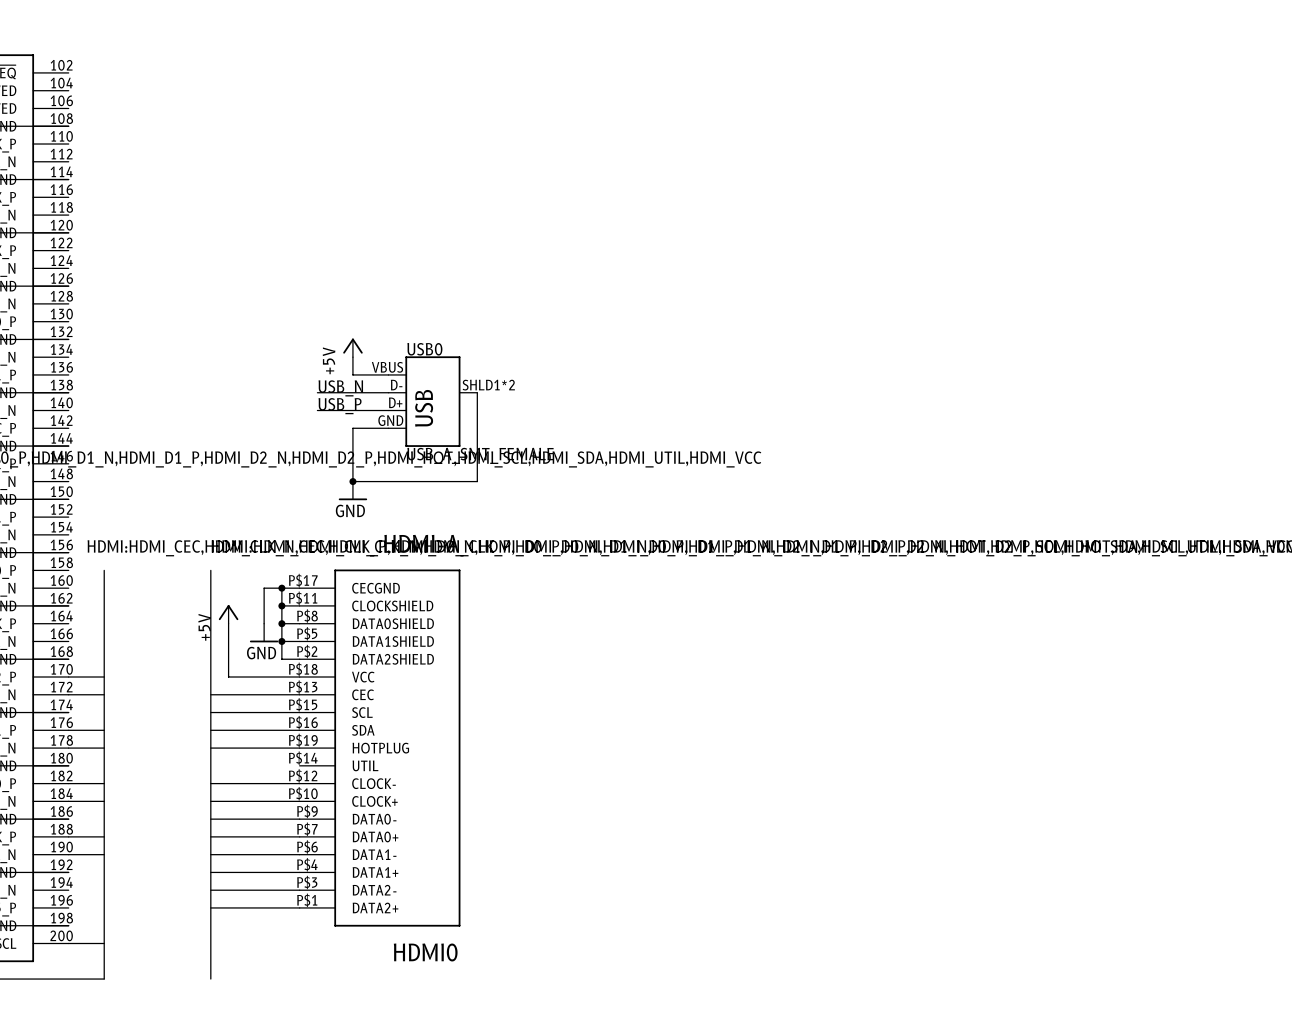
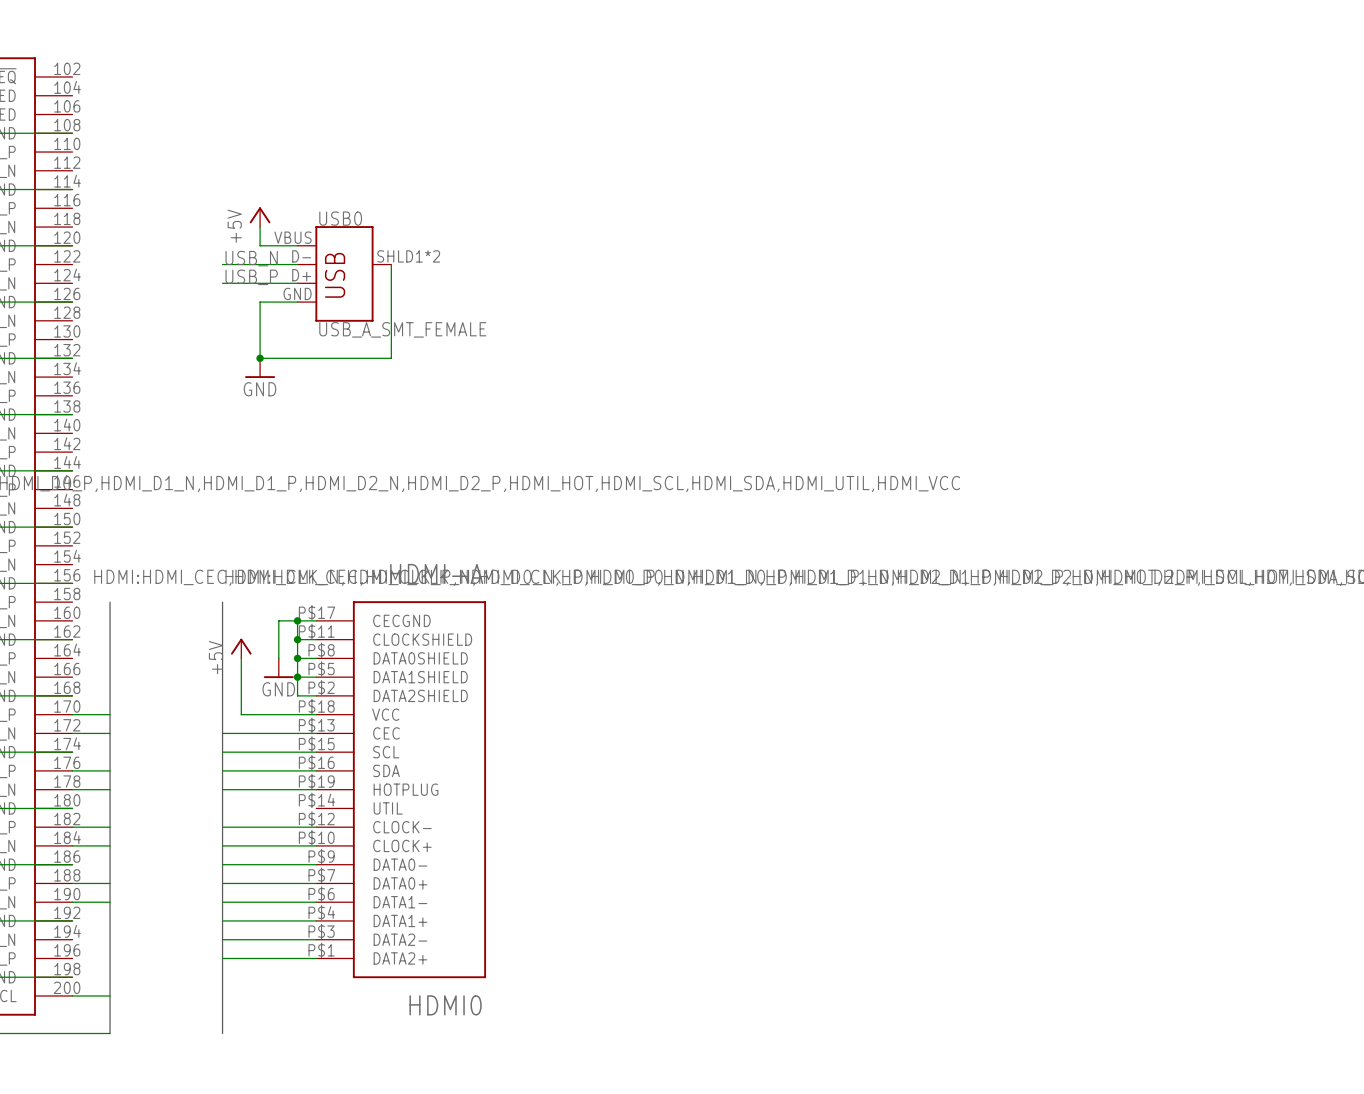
power symbol: none -> +5V (260, 217)
wire: none -> (260, 227) (260, 245) (297, 245)
label: none -> USB_N (251, 258)
wire: none -> (222, 264) (297, 264)
wire: none -> (391, 264) (391, 358) (260, 358) (260, 302) (297, 302)
label: none -> USB_P (251, 277)
junction: none -> (260, 358)
power symbol: +5V (352, 347) -> none
power symbol: none -> GND (260, 368)
wire: (352, 357) (352, 374) (388, 374) -> none
label: USB_N (340, 388) -> none
wire: (317, 392) (388, 392) -> (222, 283) (297, 283)
wire: (477, 392) (477, 481) (352, 481) (352, 428) (388, 428) -> none
USB0 position: (432, 401) -> (344, 273)
label: USB_P (340, 406) -> none
wire: (317, 410) (388, 410) -> none
junction: (352, 481) -> none
power symbol: GND (352, 490) -> none

